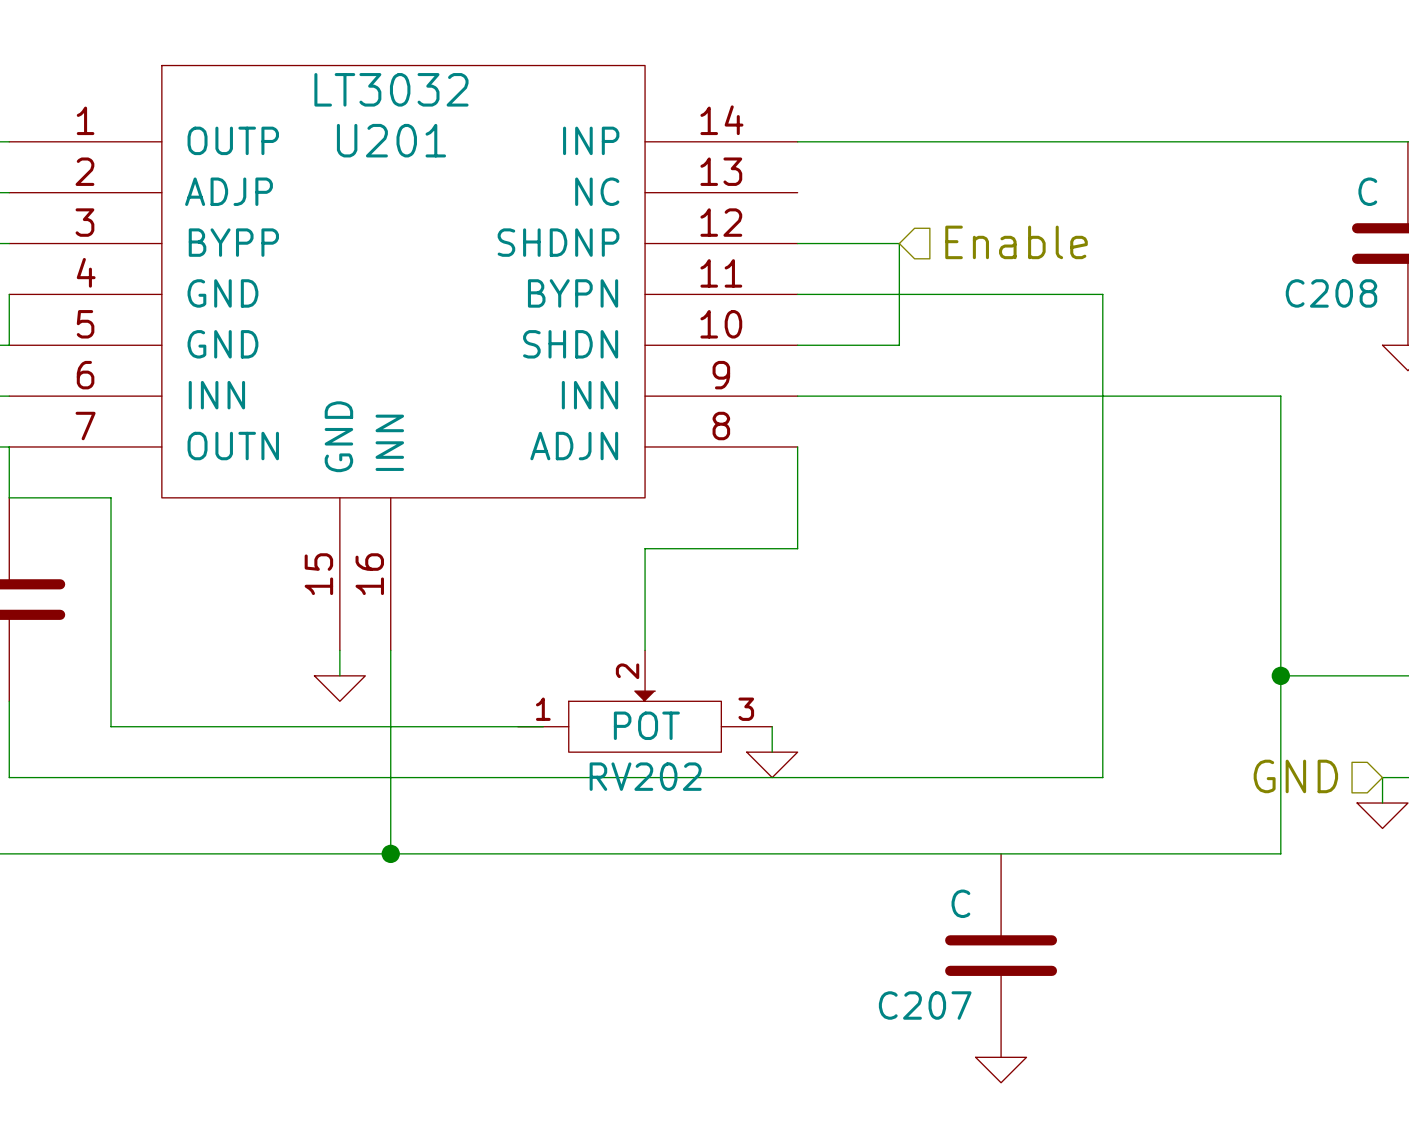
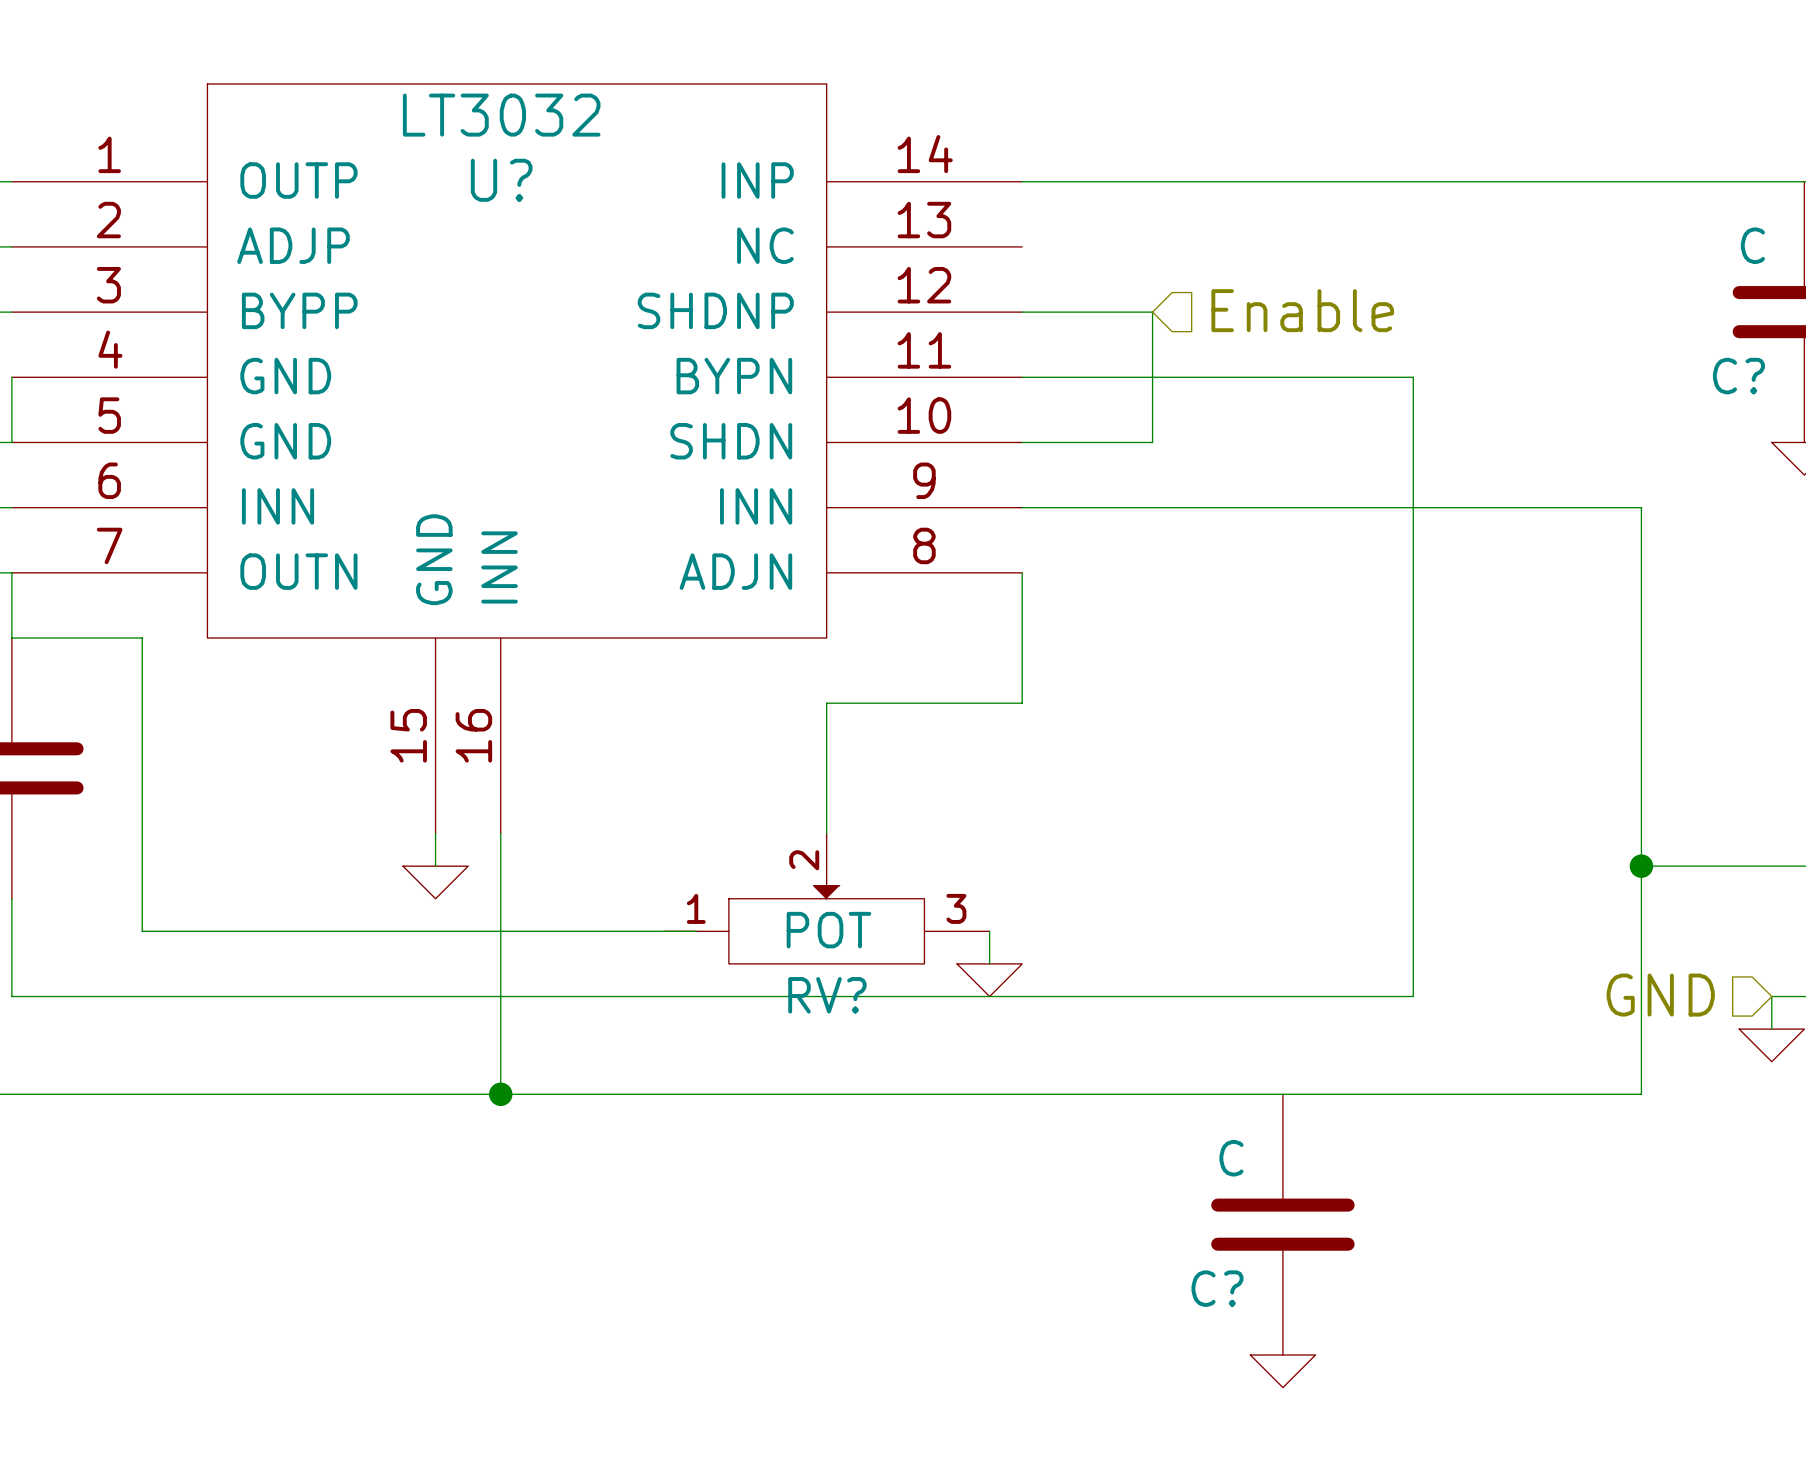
U201 name: U201 (391, 140) -> U? (501, 180)
C208 name: C208 (1331, 293) -> C? (1738, 376)
RV202 name: RV202 (645, 776) -> RV? (827, 995)
C207 name: C207 (925, 1005) -> C? (1217, 1288)

